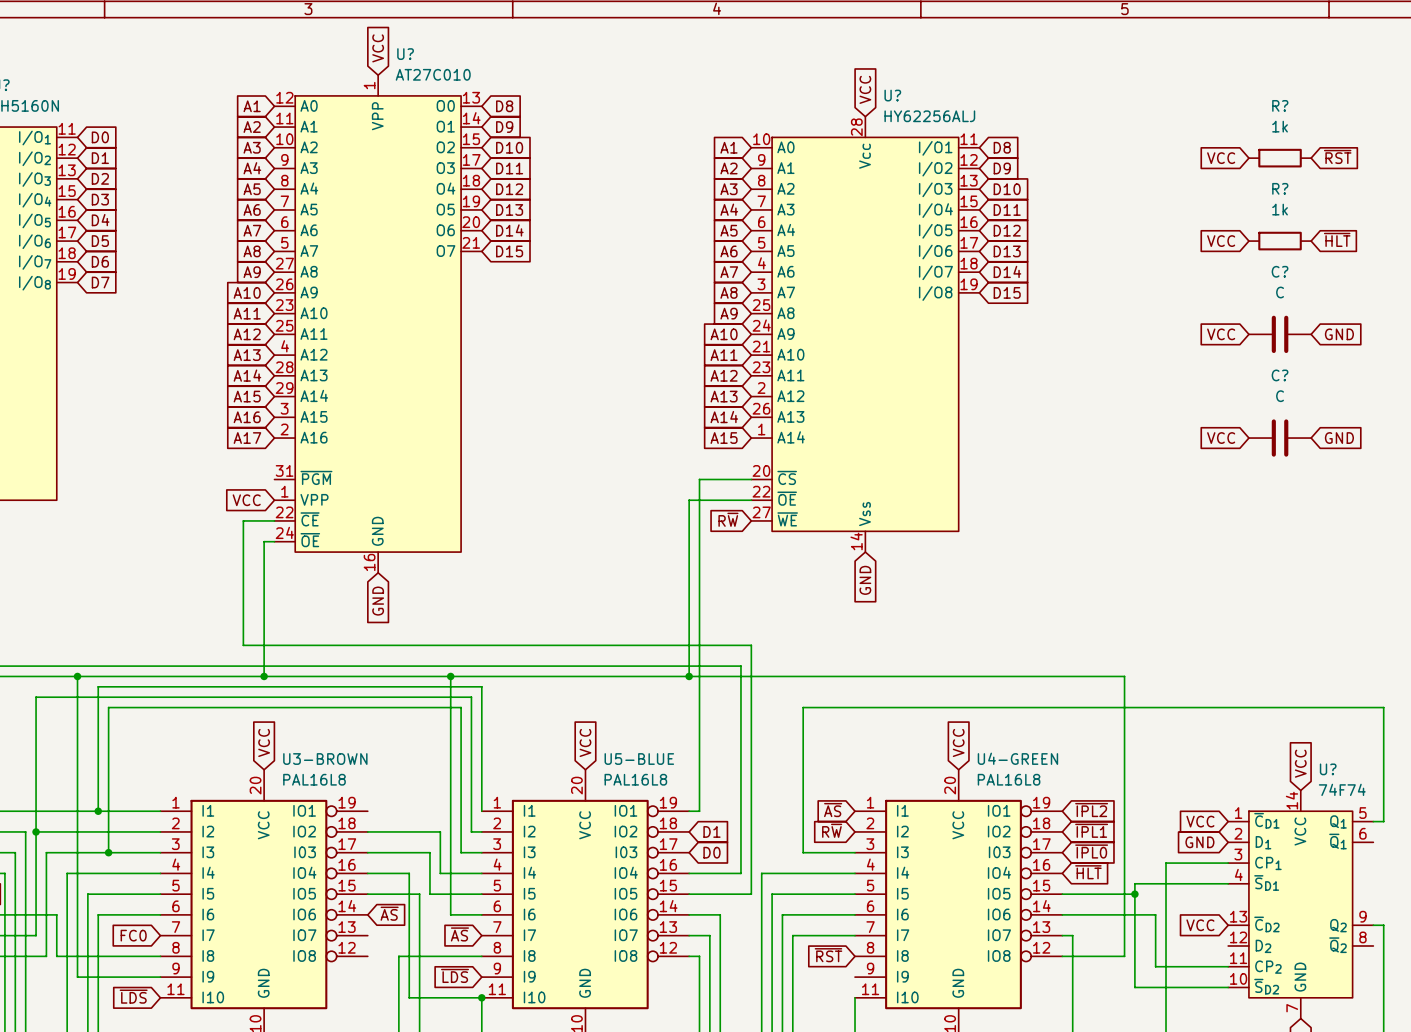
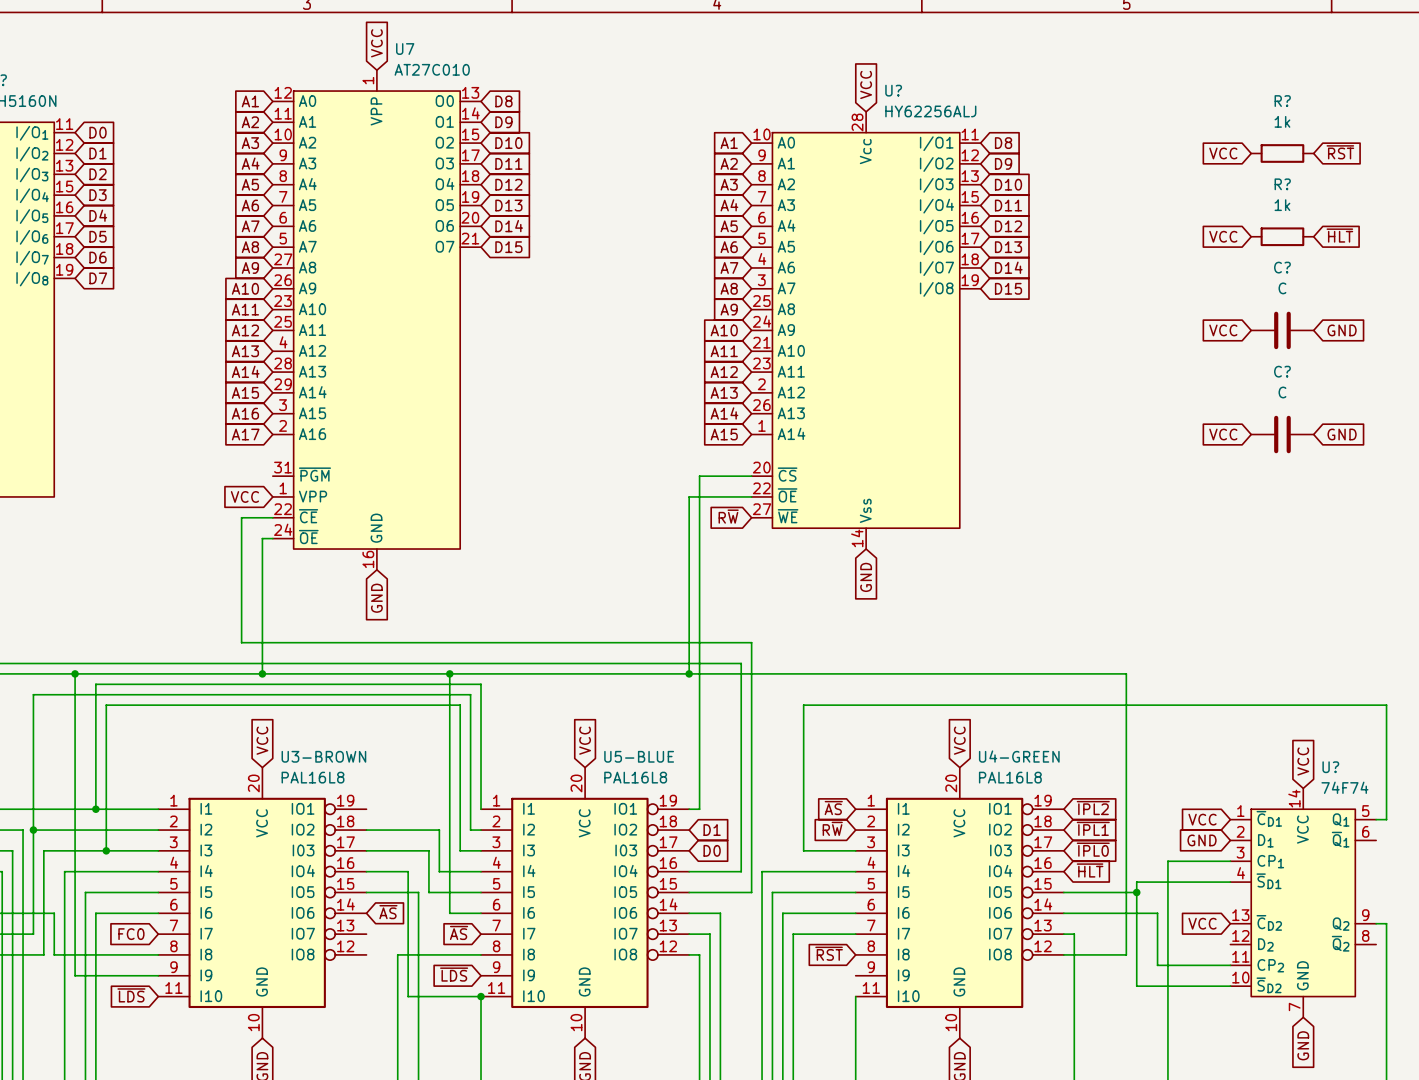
U? name: U? (405, 54) -> U7 (405, 49)

